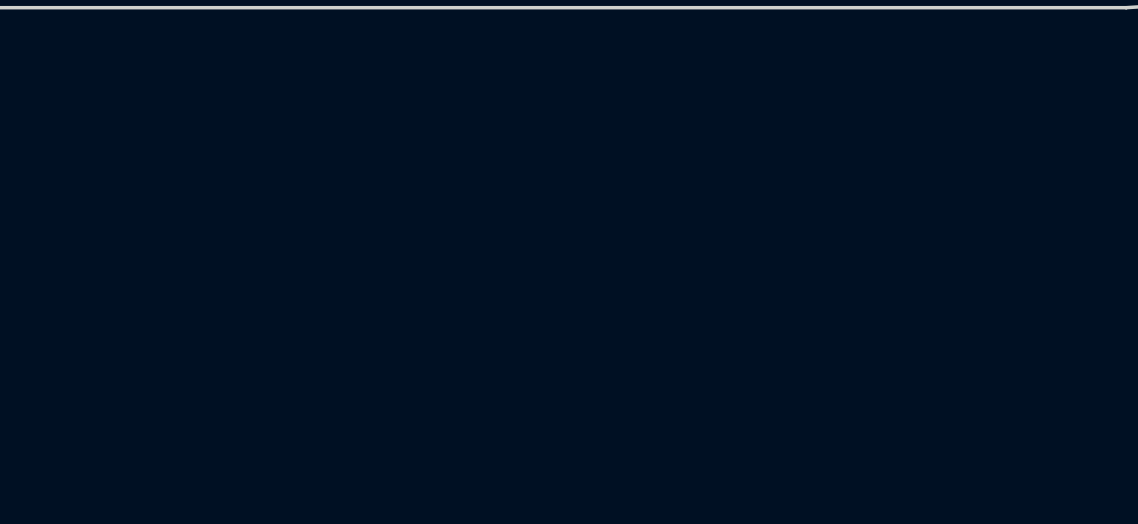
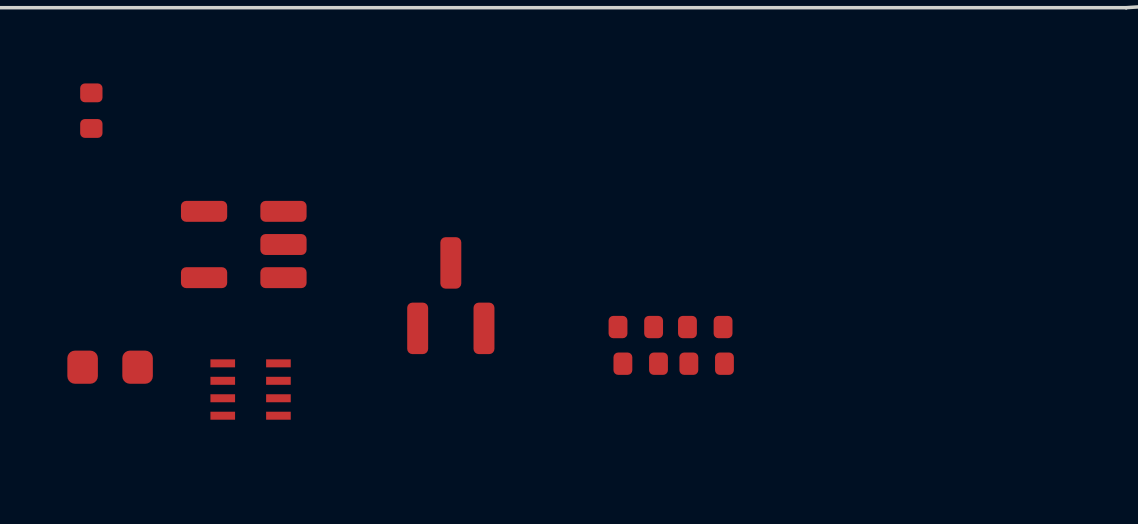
part: none -> (91, 110)
part: none -> (243, 244)
part: none -> (450, 295)
part: none -> (635, 327)
part: none -> (705, 327)
part: none -> (640, 363)
part: none -> (706, 363)
part: none -> (110, 367)
part: none -> (250, 389)

